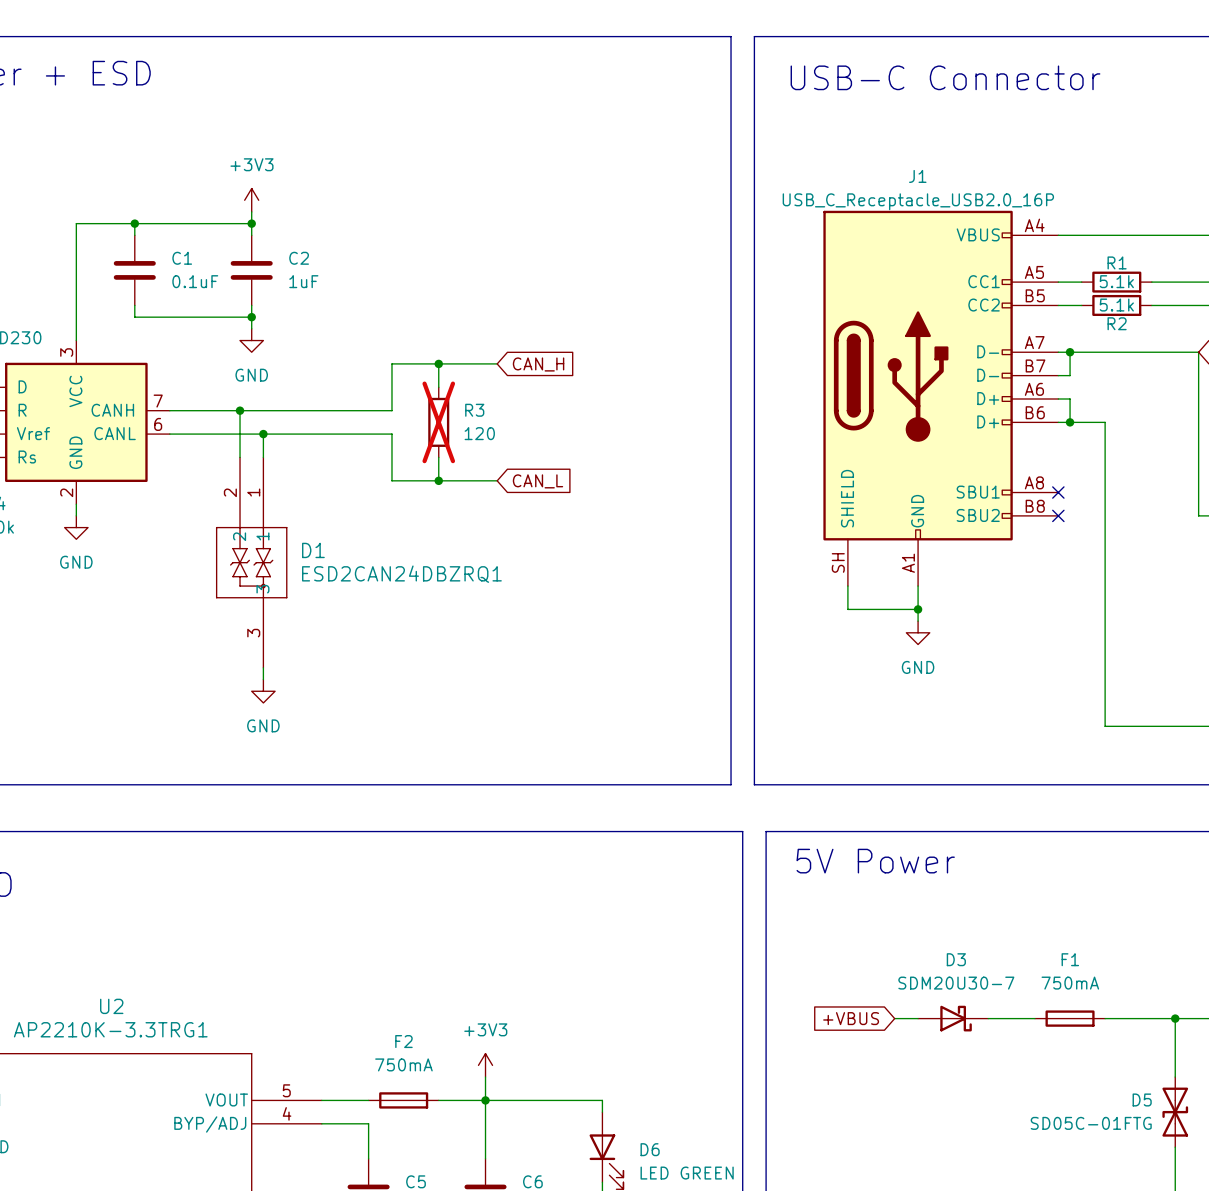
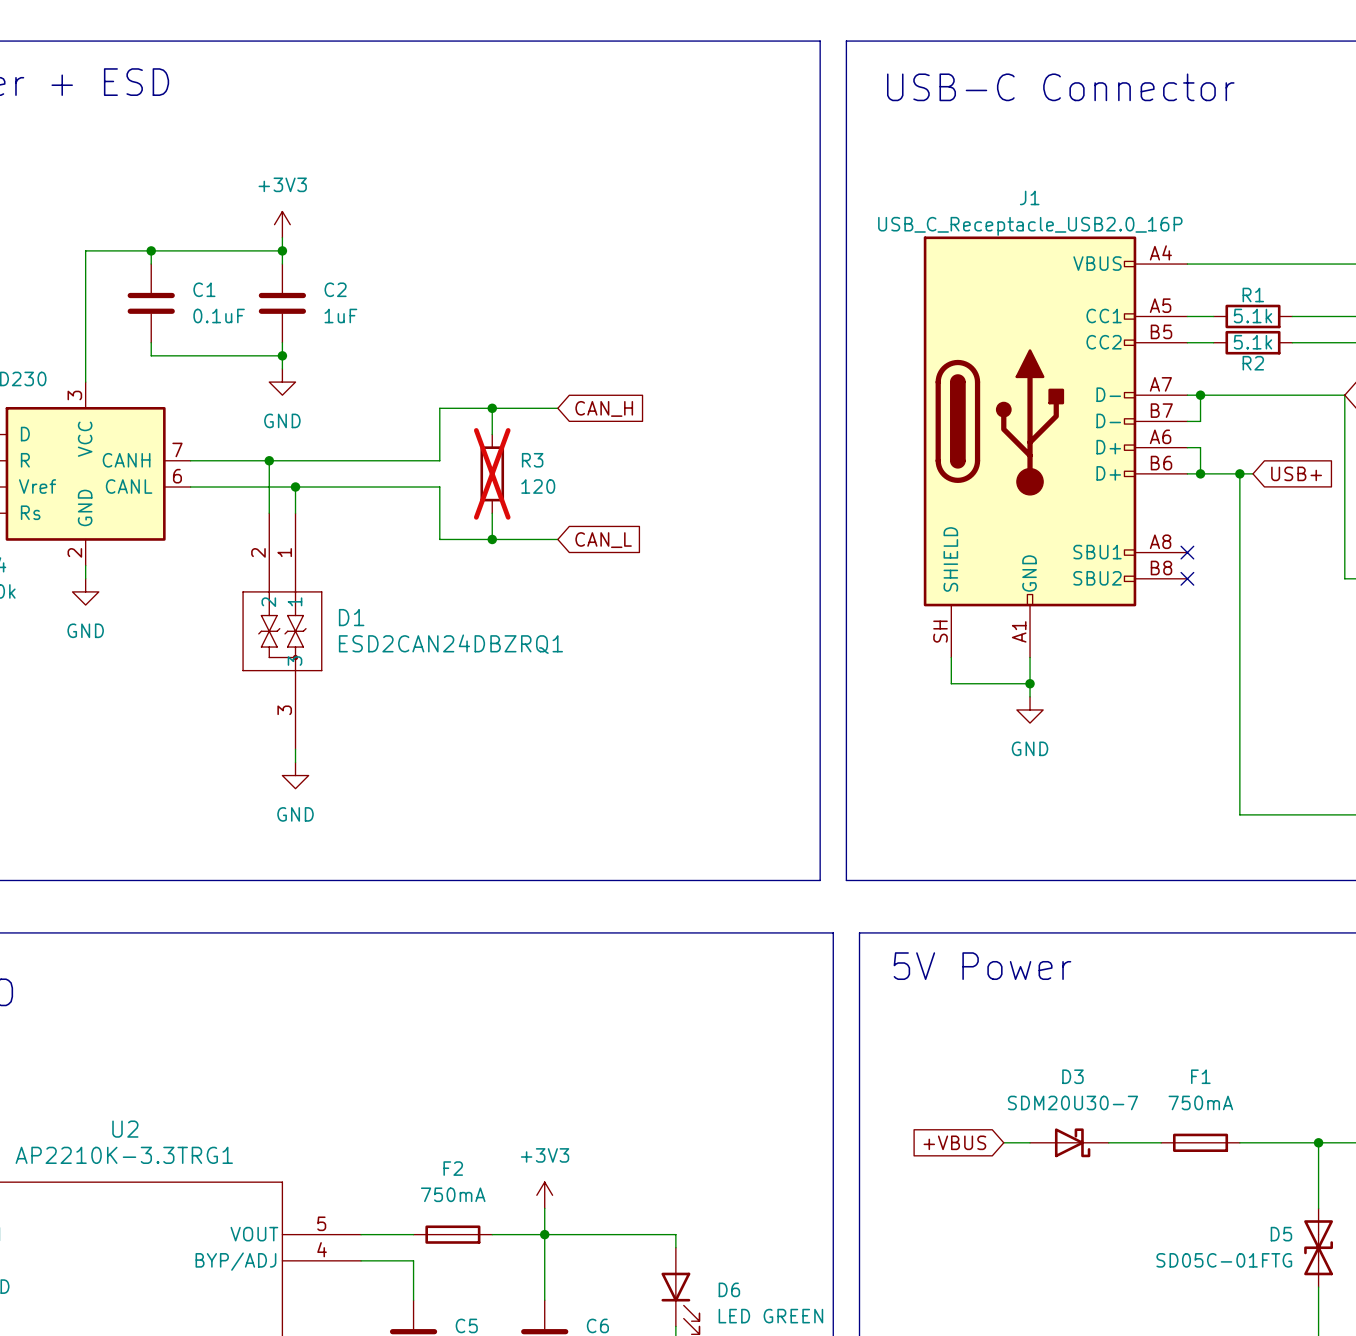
wire: none -> (1239, 473) (1252, 473)
junction: none -> (1239, 473)
global label: none -> USB+ (1296, 473)

